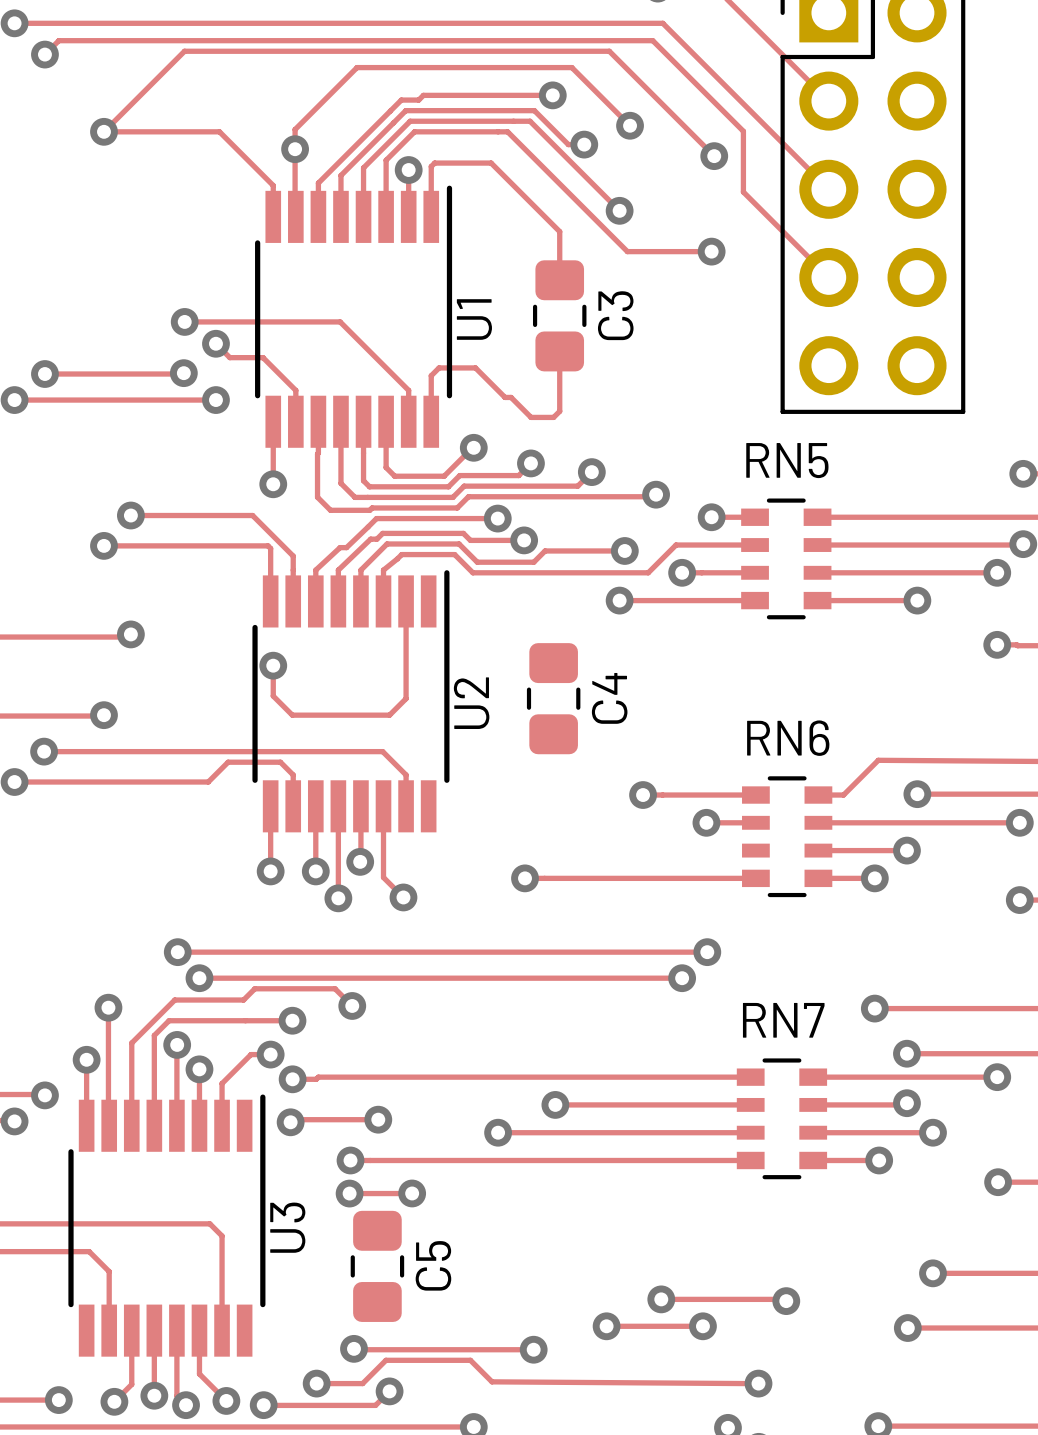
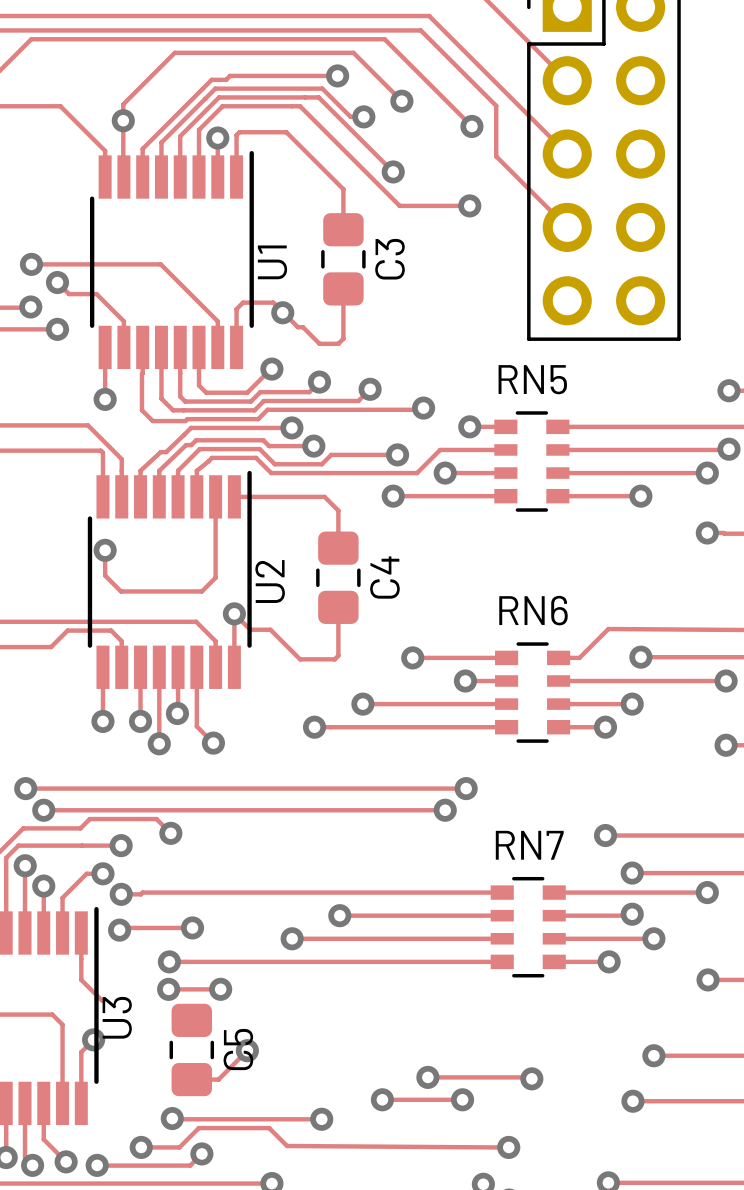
via: none -> (282, 312)
track: none -> (234, 496) (324, 496) (338, 510) (338, 548)
track: none -> (338, 607) (338, 655) (334, 659) (300, 659) (270, 629) (250, 629) (234, 613) (234, 667)
via: none -> (234, 613)
track: none -> (362, 704) (506, 704)
via: none -> (362, 704)
track: none -> (81, 933) (81, 979) (102, 1000)
track: none -> (93, 1039) (81, 1052) (81, 1103)
via: none -> (93, 1039)
track: none -> (247, 1050) (218, 1079) (191, 1079)
via: none -> (247, 1050)

